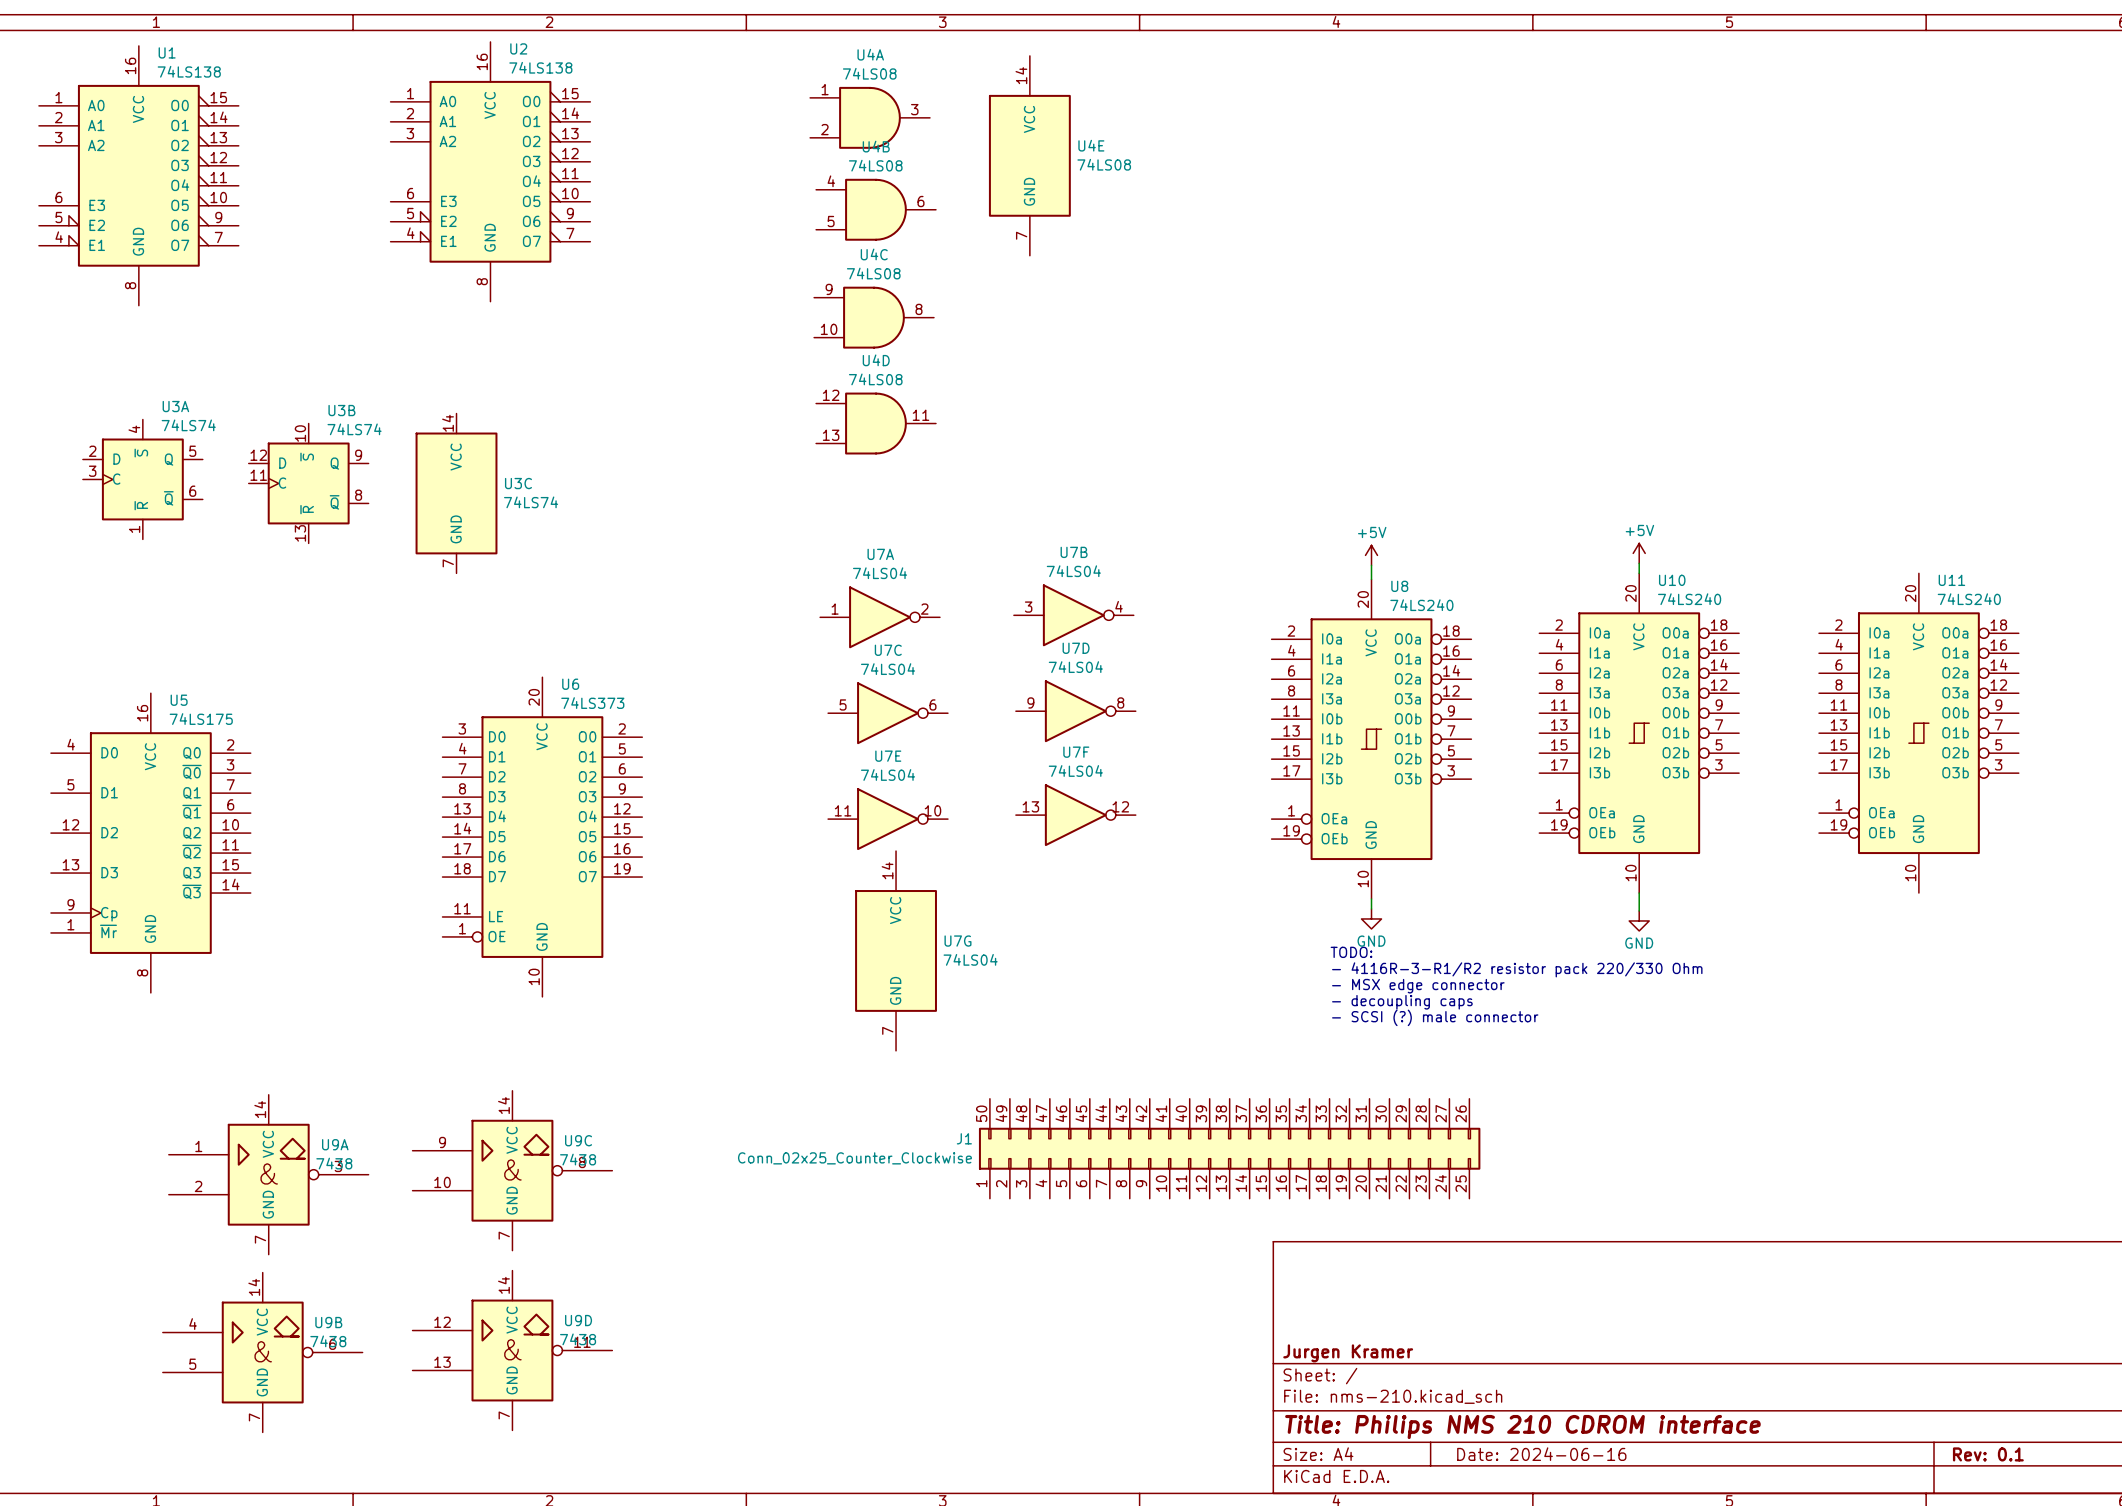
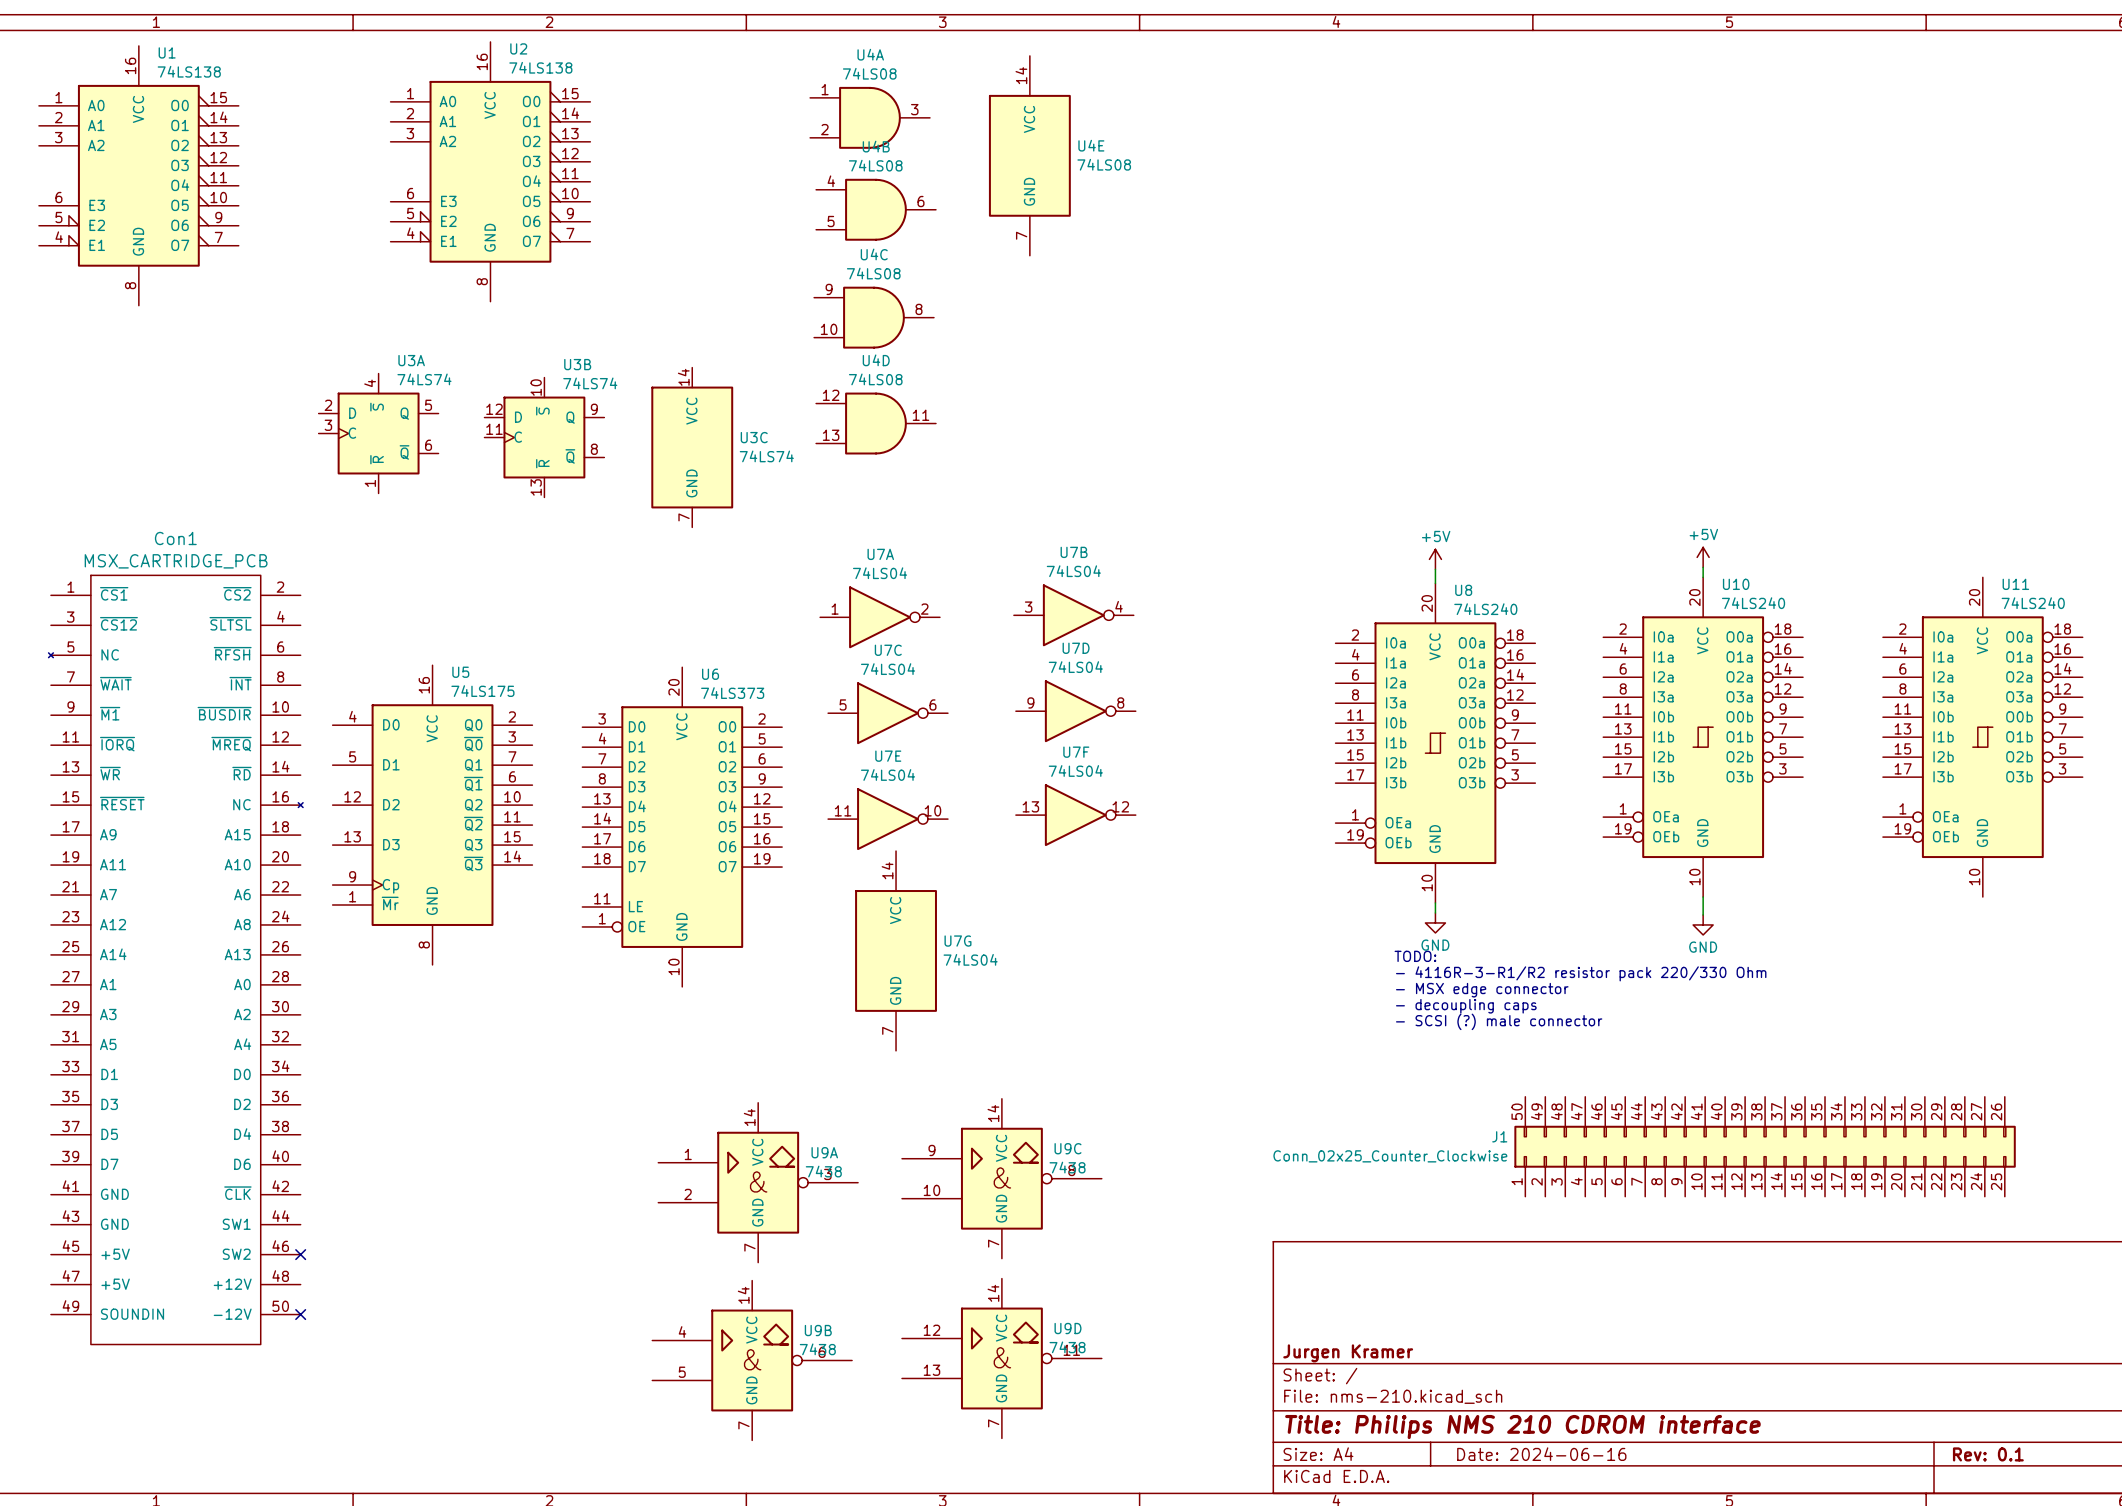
U3A position: (142, 479) -> (378, 433)
U3B position: (308, 483) -> (544, 437)
U3C position: (456, 493) -> (692, 447)
power symbol position: +5V (1639, 553) -> +5V (1703, 557)
power symbol position: +5V (1371, 555) -> +5V (1435, 559)
wire: (1639, 563) (1639, 573) -> (1703, 567) (1703, 577)
wire: (1371, 565) (1371, 579) -> (1435, 569) (1435, 583)
U10 position: (1639, 733) -> (1703, 737)
U11 position: (1918, 733) -> (1982, 737)
U8 position: (1371, 739) -> (1435, 743)
U6 position: (542, 837) -> (682, 827)
U5 position: (150, 843) -> (432, 815)
wire: (1639, 893) (1639, 910) -> (1703, 897) (1703, 914)
wire: (1371, 899) (1371, 908) -> (1435, 903) (1435, 912)
power symbol position: GND (1371, 918) -> GND (1435, 922)
power symbol position: GND (1639, 920) -> GND (1703, 924)
text position: TODO: (1351, 952) -> TODO: (1415, 956)
Con1: none -> MSX_CARTRIDGE_PCB (175, 959)
text position: - 4116R-3-R1/R2 resistor pack 220/330 Ohm (1517, 969) -> - 4116R-3-R1/R2 resistor pack 220/330 Ohm (1581, 973)
text position: - MSX edge connector (1418, 986) -> - MSX edge connector (1482, 990)
text position: - decoupling caps (1402, 1002) -> - decoupling caps (1466, 1006)
text position: - SCSI (?) male connector (1435, 1017) -> - SCSI (?) male connector (1499, 1021)
J1 position: (1229, 1148) -> (1765, 1146)
U9C position: (512, 1170) -> (1001, 1178)
U9A position: (268, 1174) -> (758, 1182)
no-connect mark: none -> (300, 1254)
no-connect mark: none -> (300, 1314)
U9D position: (512, 1350) -> (1001, 1358)
U9B position: (262, 1352) -> (752, 1360)

